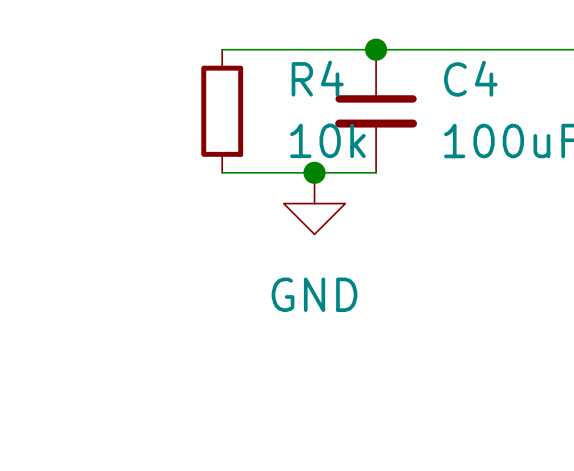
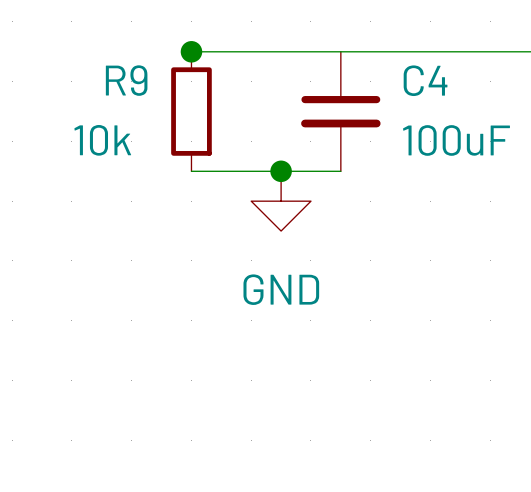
junction: none -> (191, 51)
junction: (376, 49) -> none
R4 name: R4 (317, 78) -> R9 (126, 80)
R4 value position: 10k (327, 140) -> 10k (102, 140)

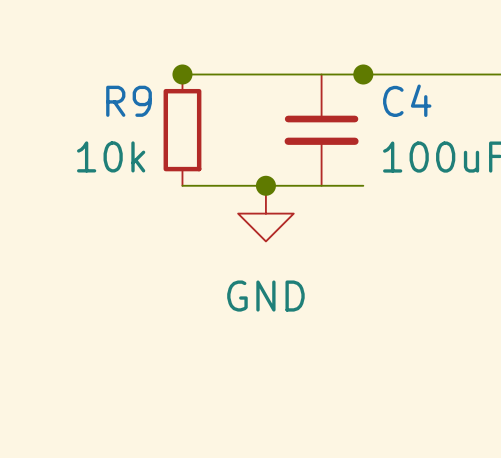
junction: none -> (363, 74)
wire: none -> (321, 185) (363, 185)

